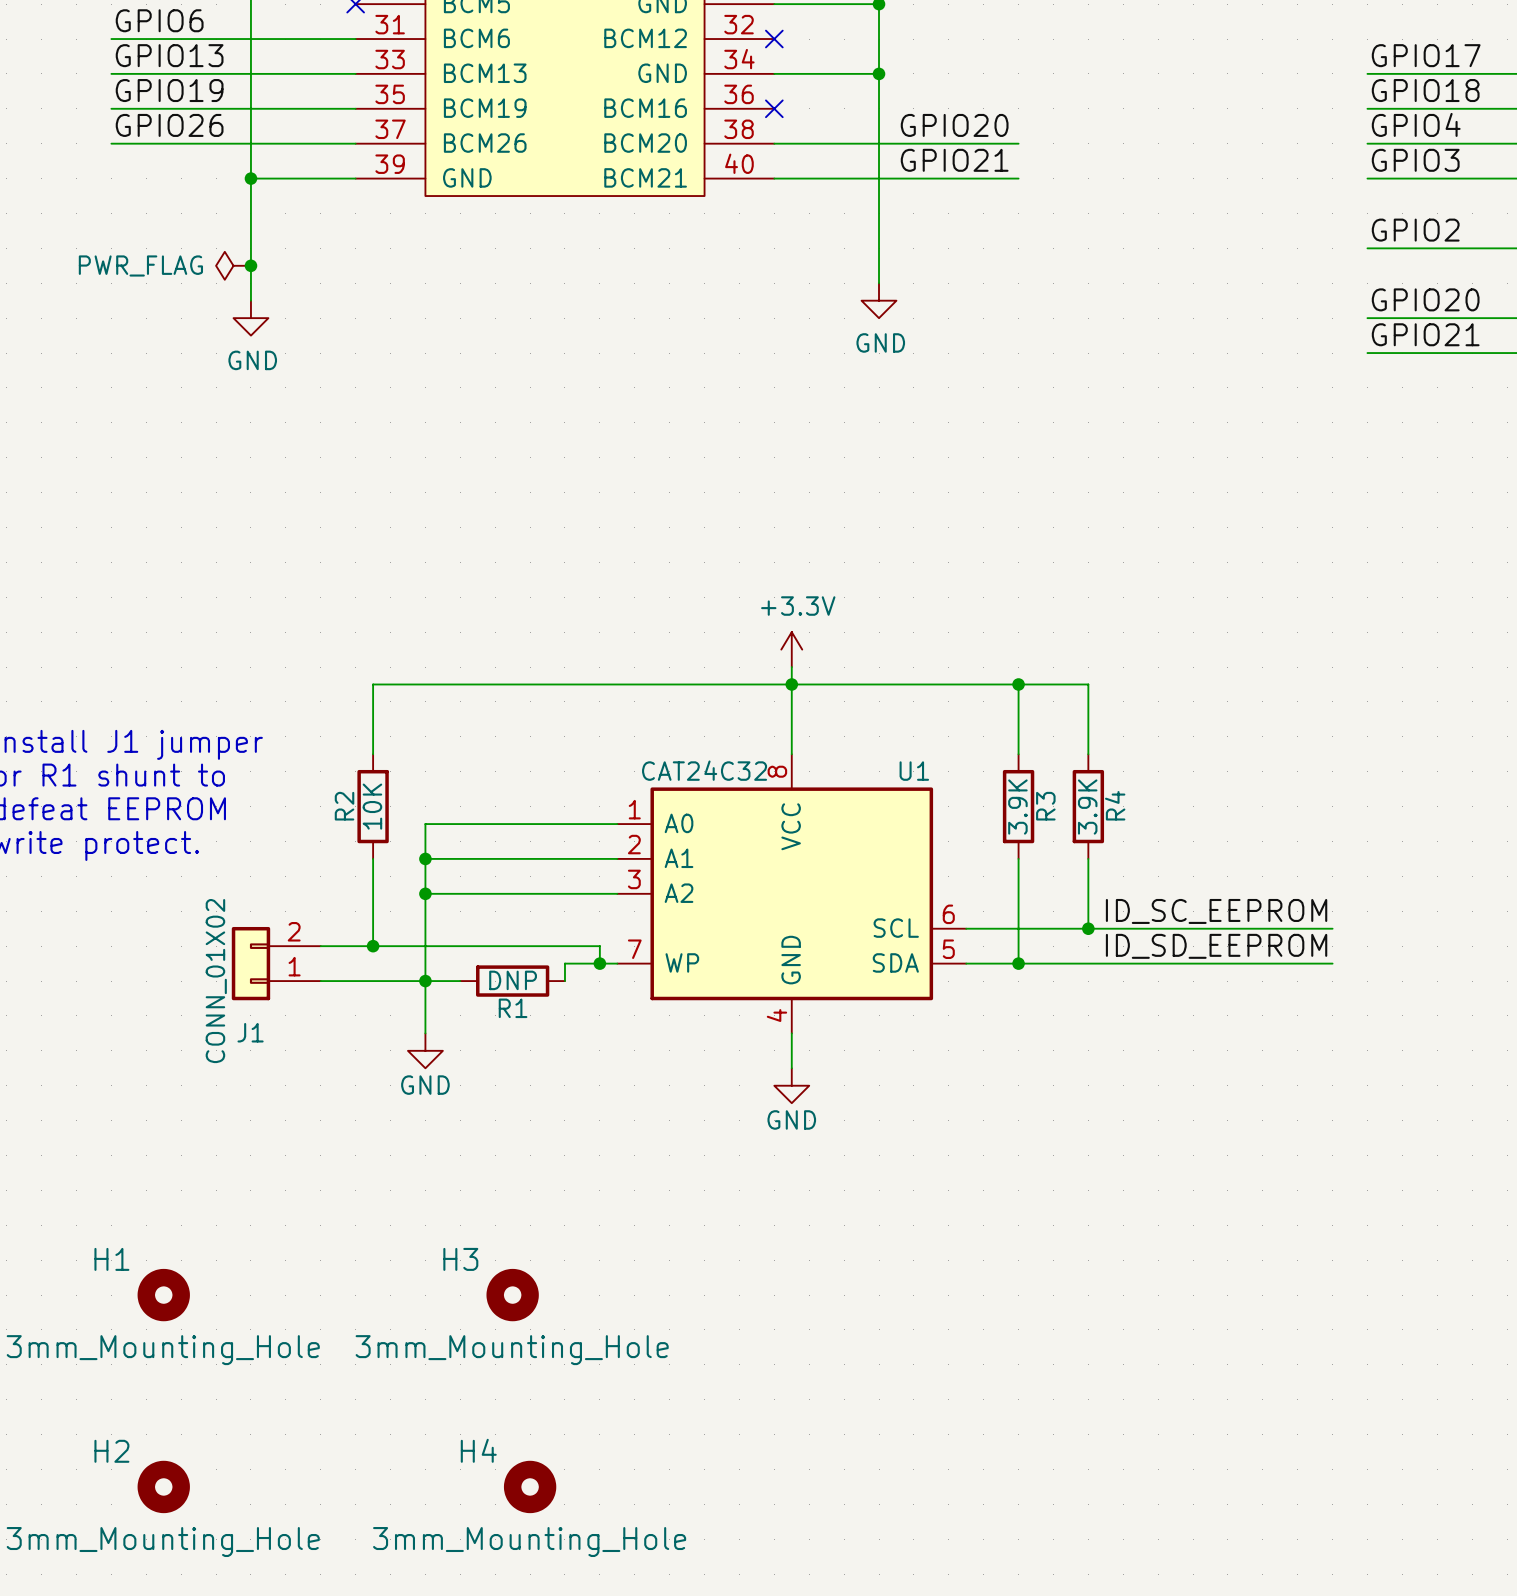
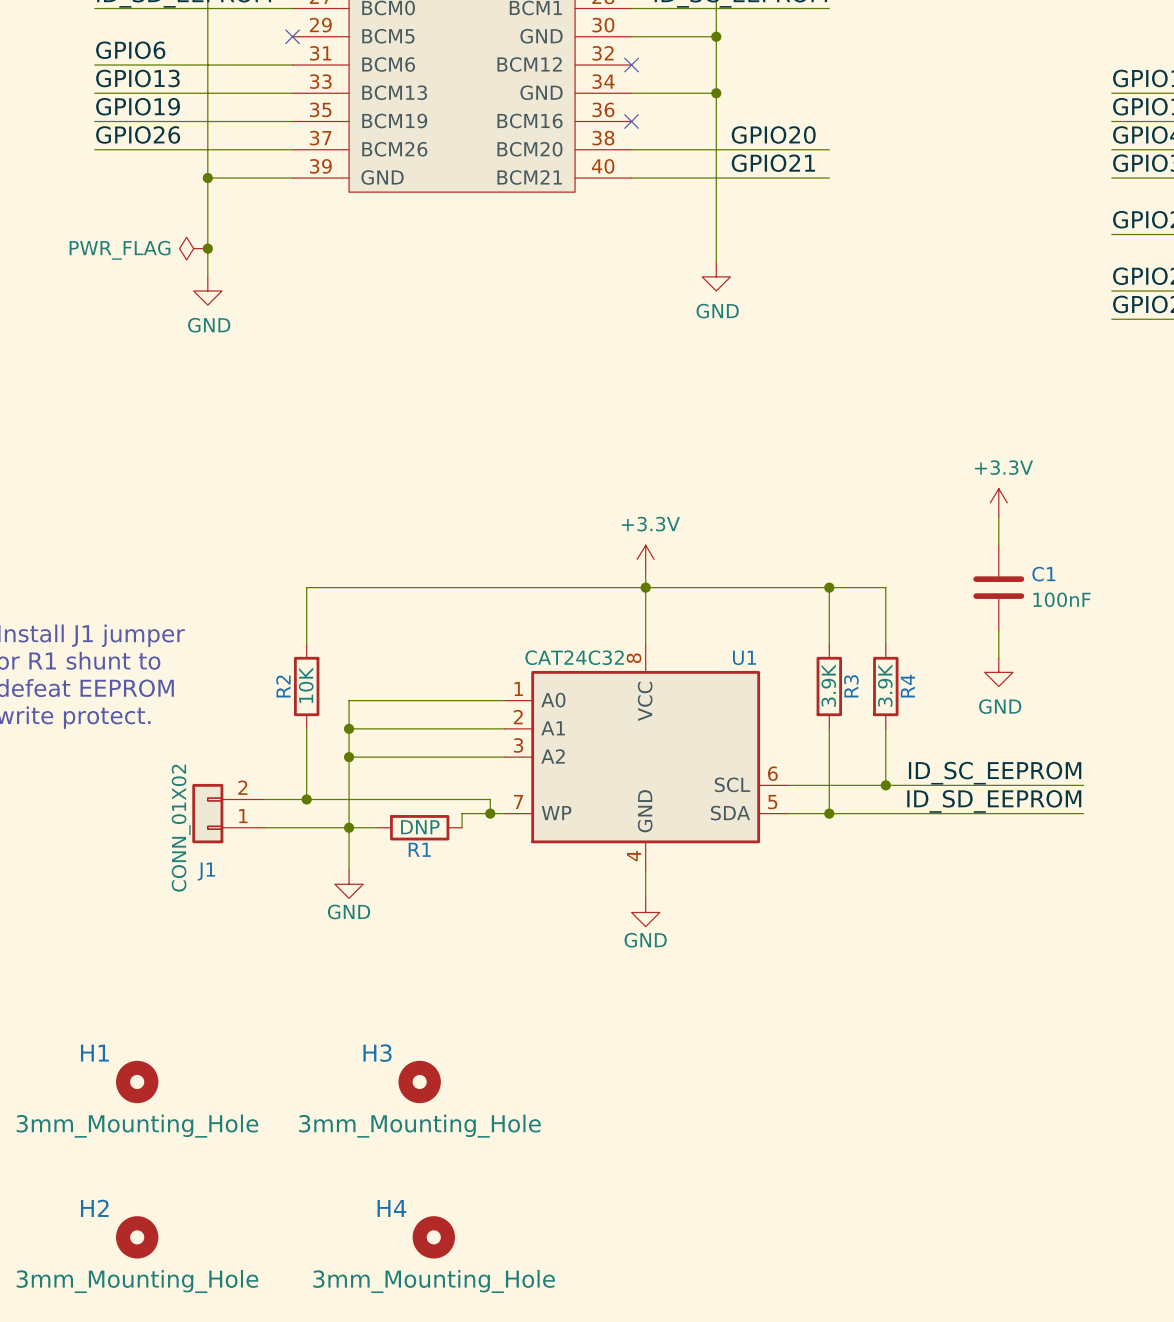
power symbol: none -> +3.3V (998, 502)
wire: none -> (998, 517) (998, 545)
C1: none -> 100nF (998, 587)
wire: none -> (998, 630) (998, 658)
power symbol: none -> GND (998, 672)

